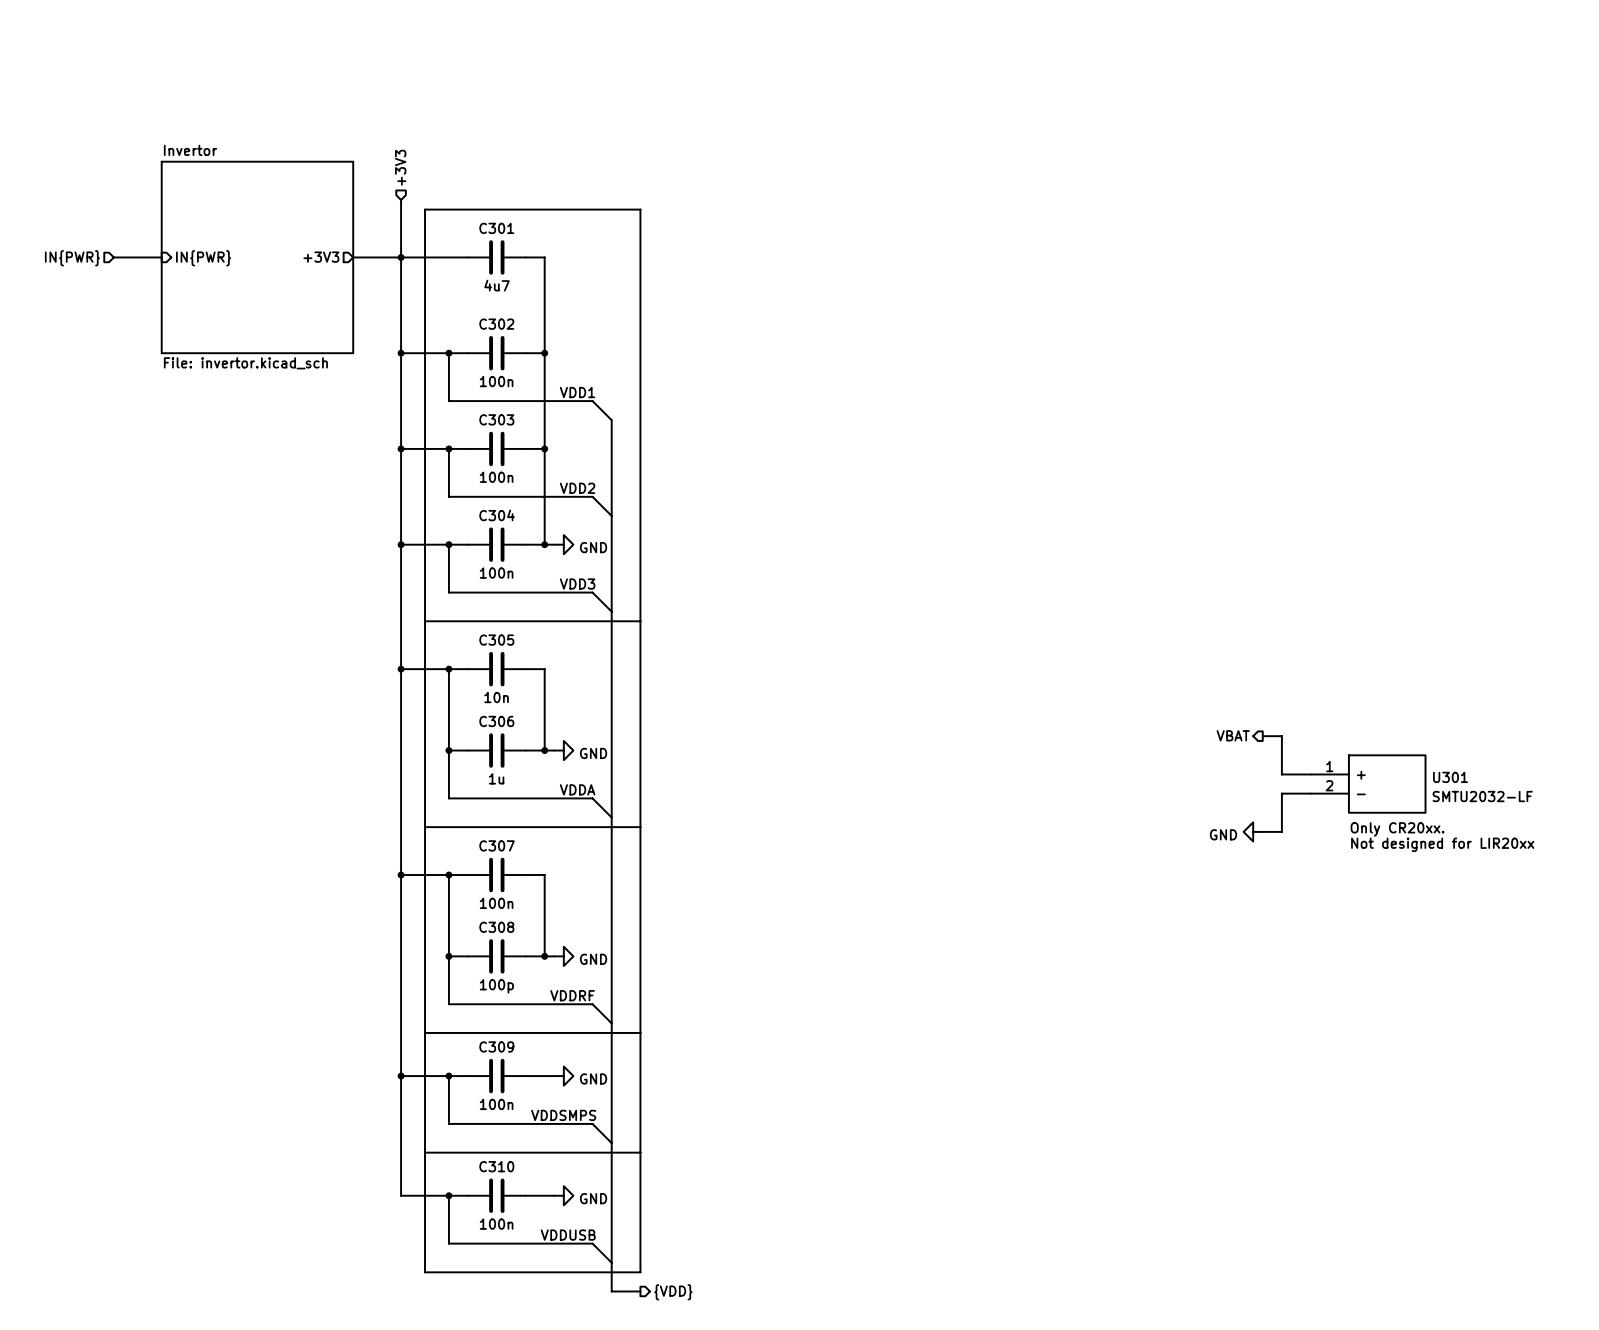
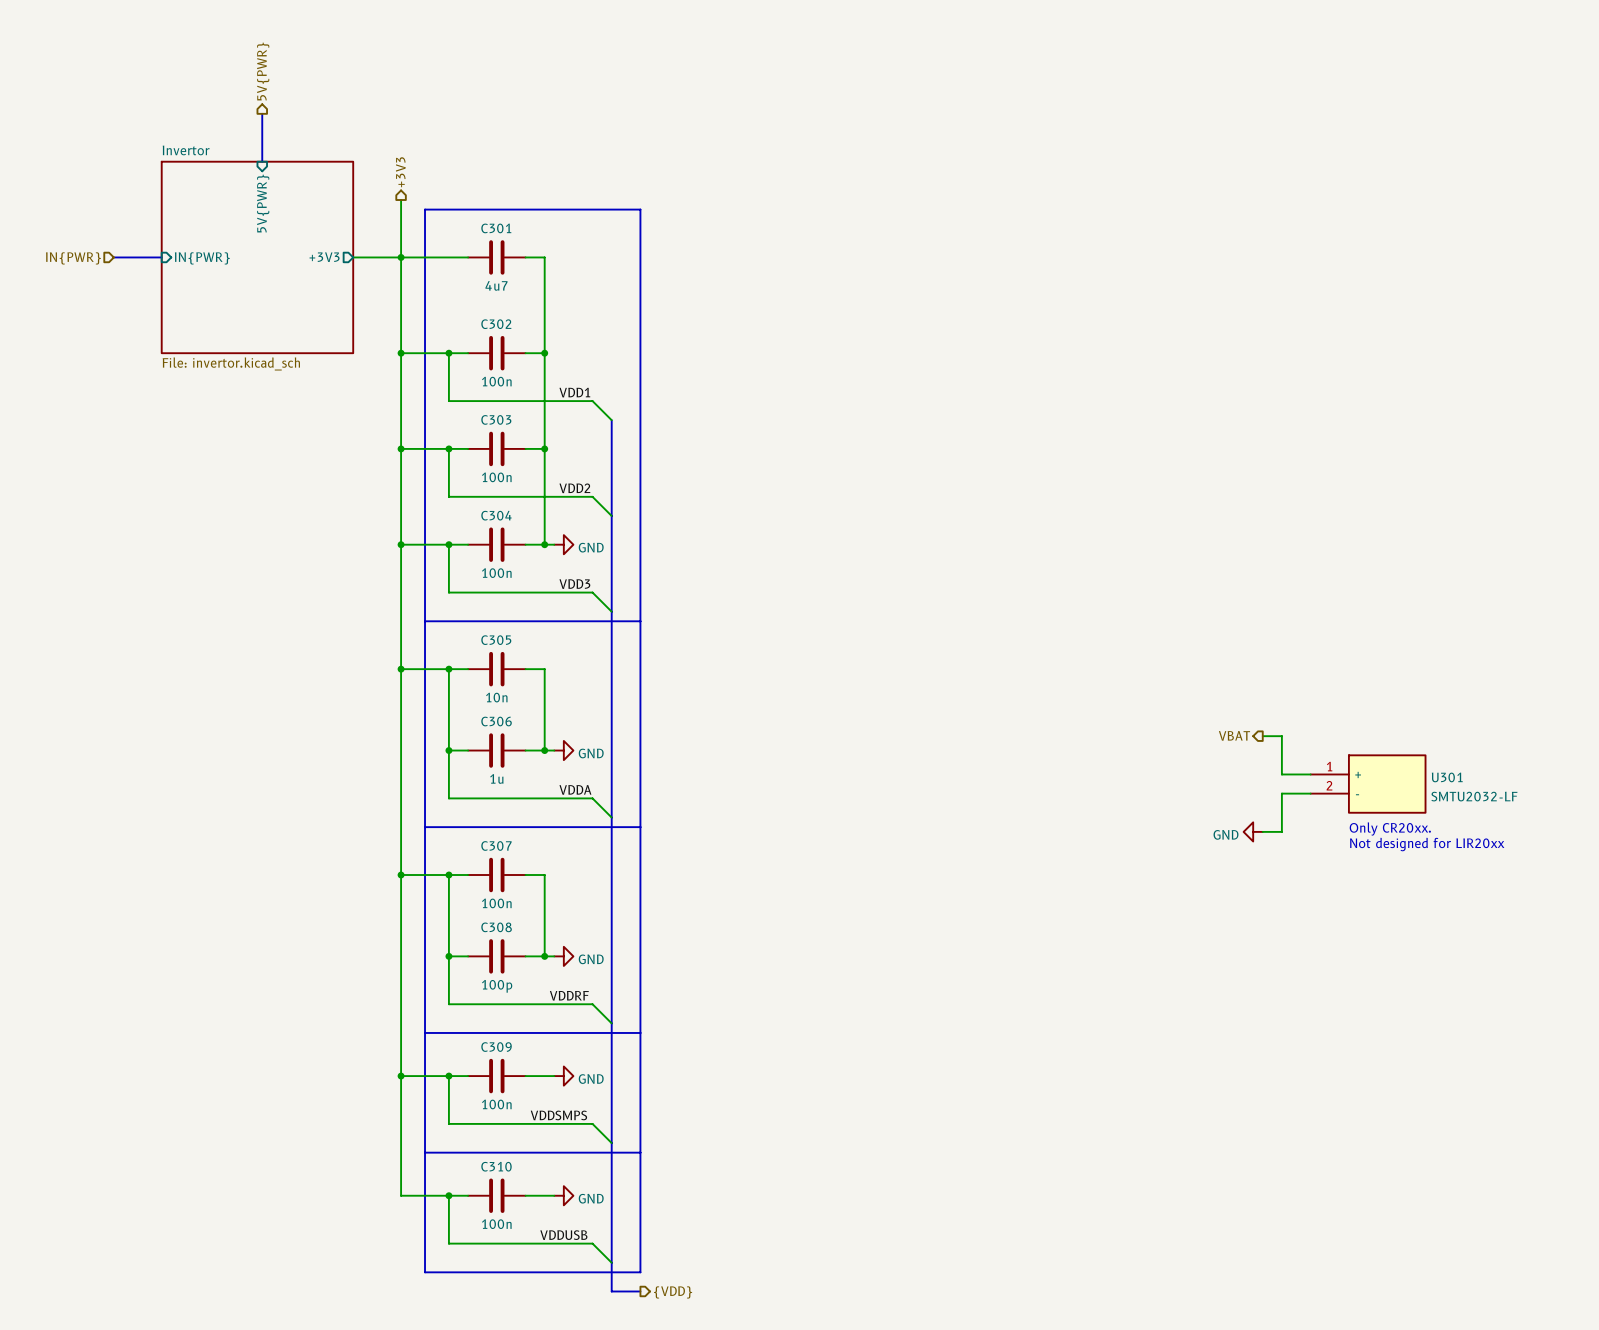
hierarchical label: none -> 5V{PWR} (263, 71)
bus: none -> (262, 113) (262, 161)
hierarchical label shape: input (400, 167) -> output (400, 172)
sheet pin: none -> 5V{PWR} (263, 203)

